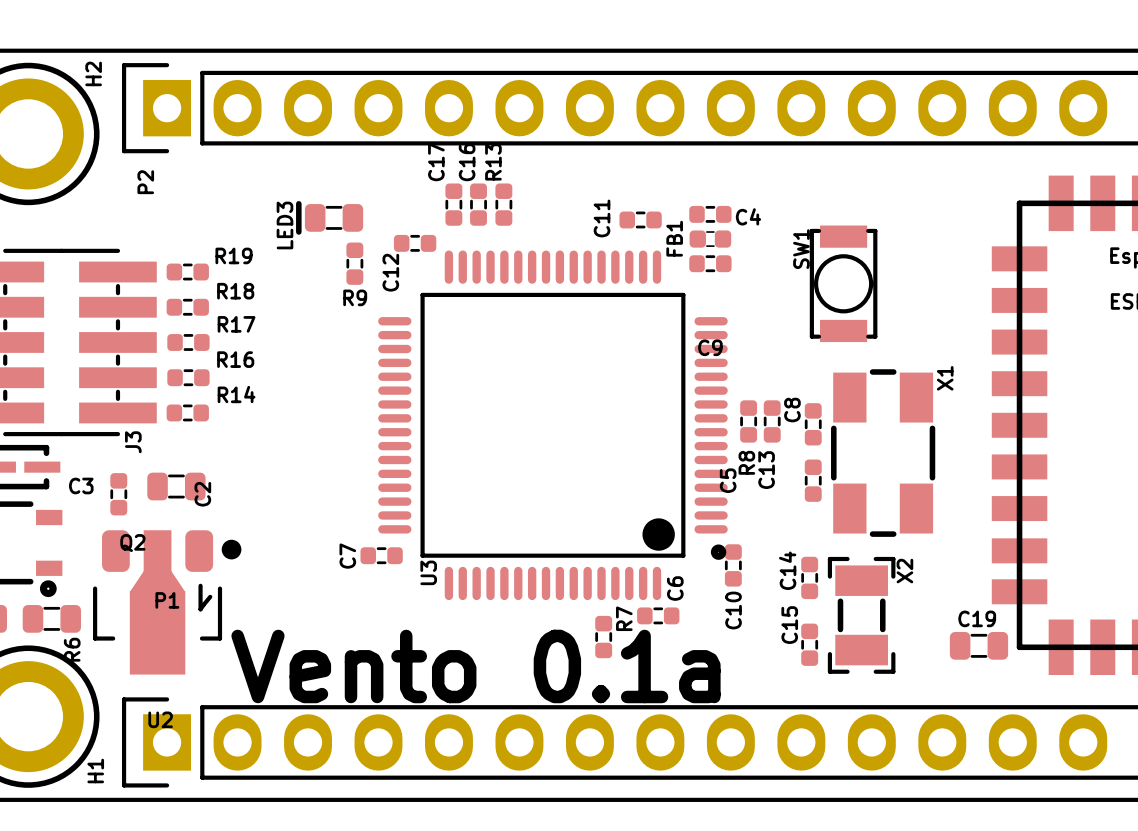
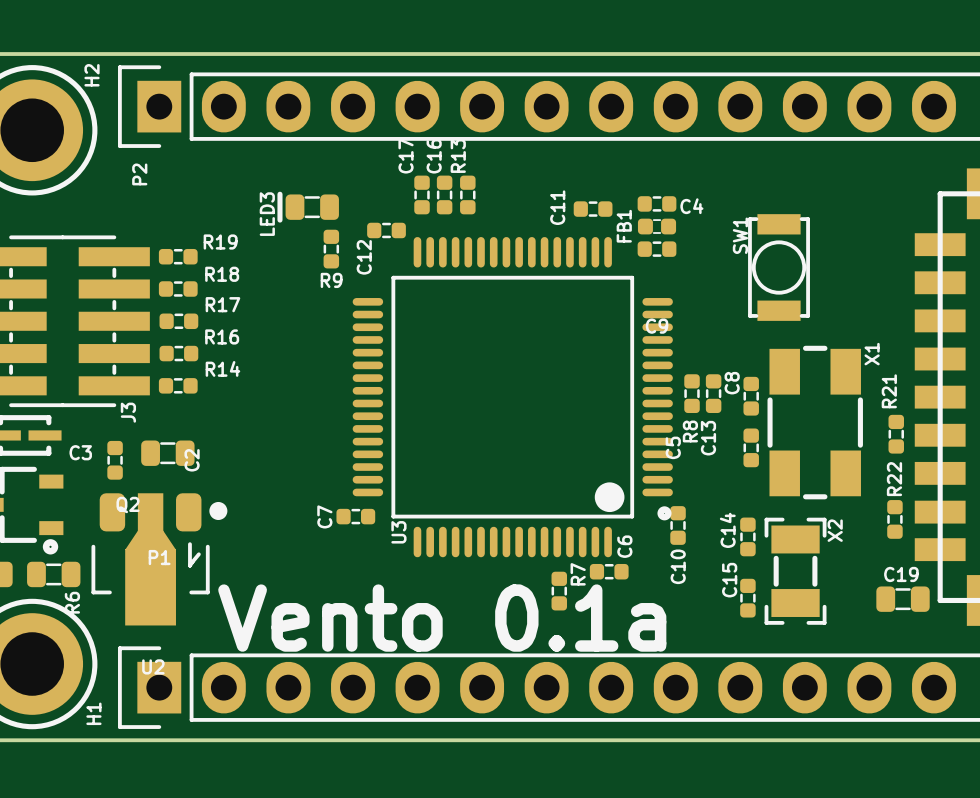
R21: none -> (896, 434)
R22: none -> (894, 519)

